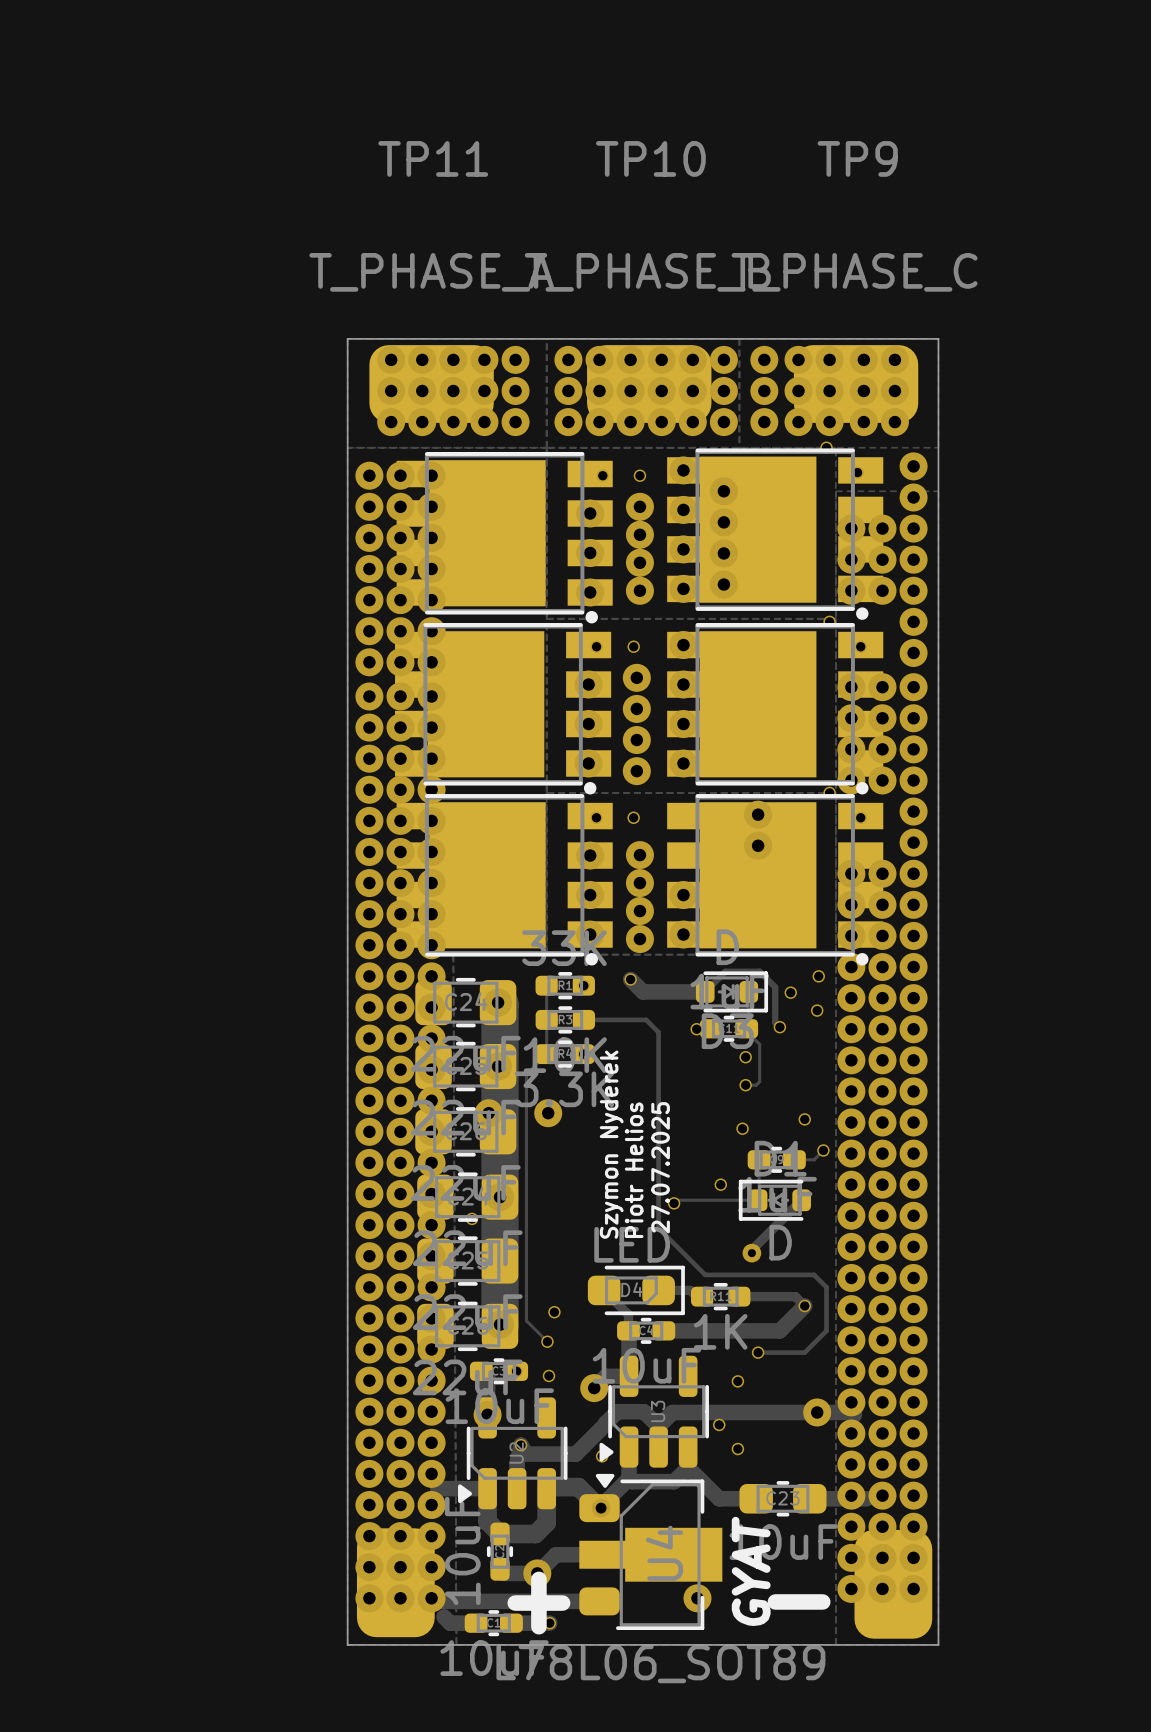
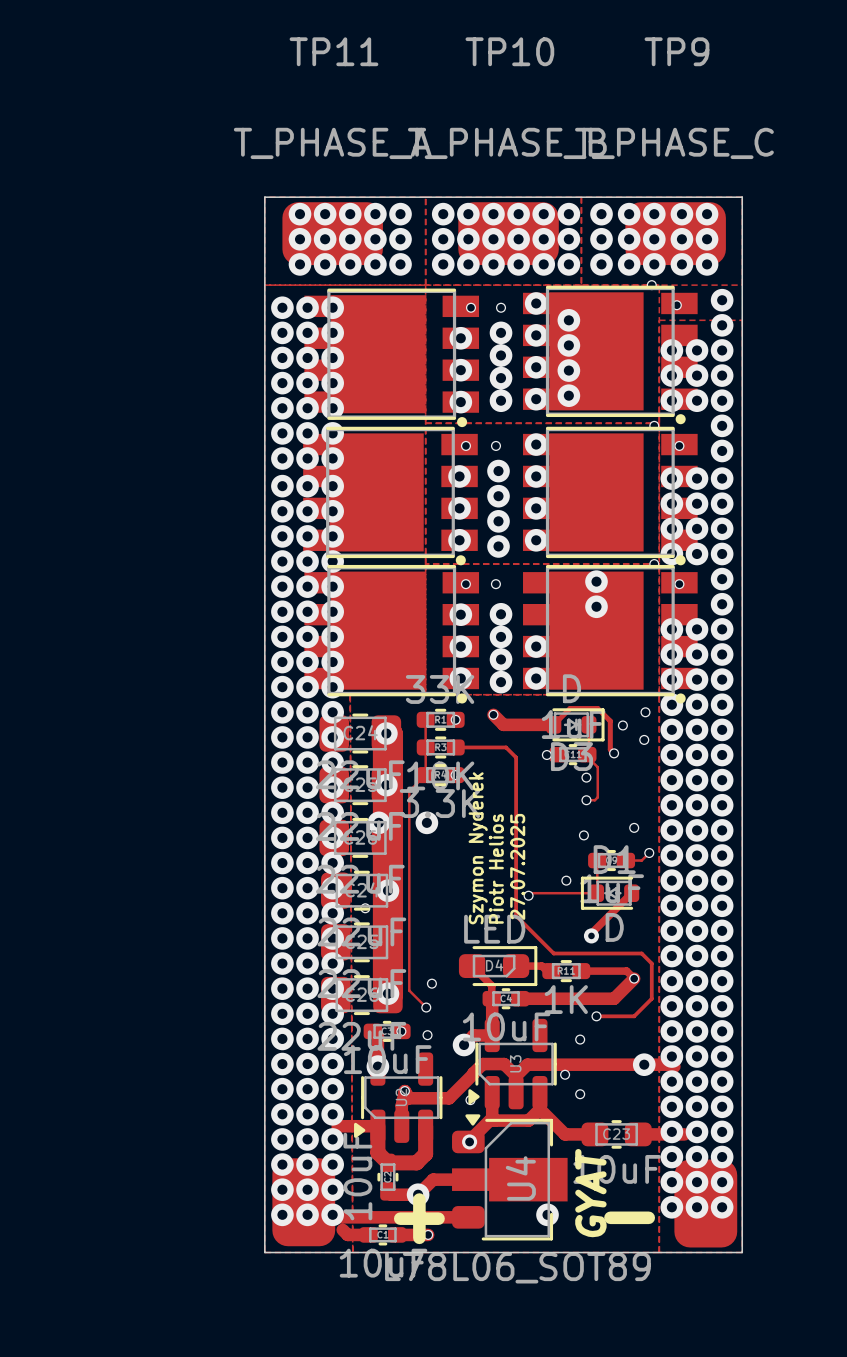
track: (546, 1488) (578, 1487) (599, 1508) -> none

